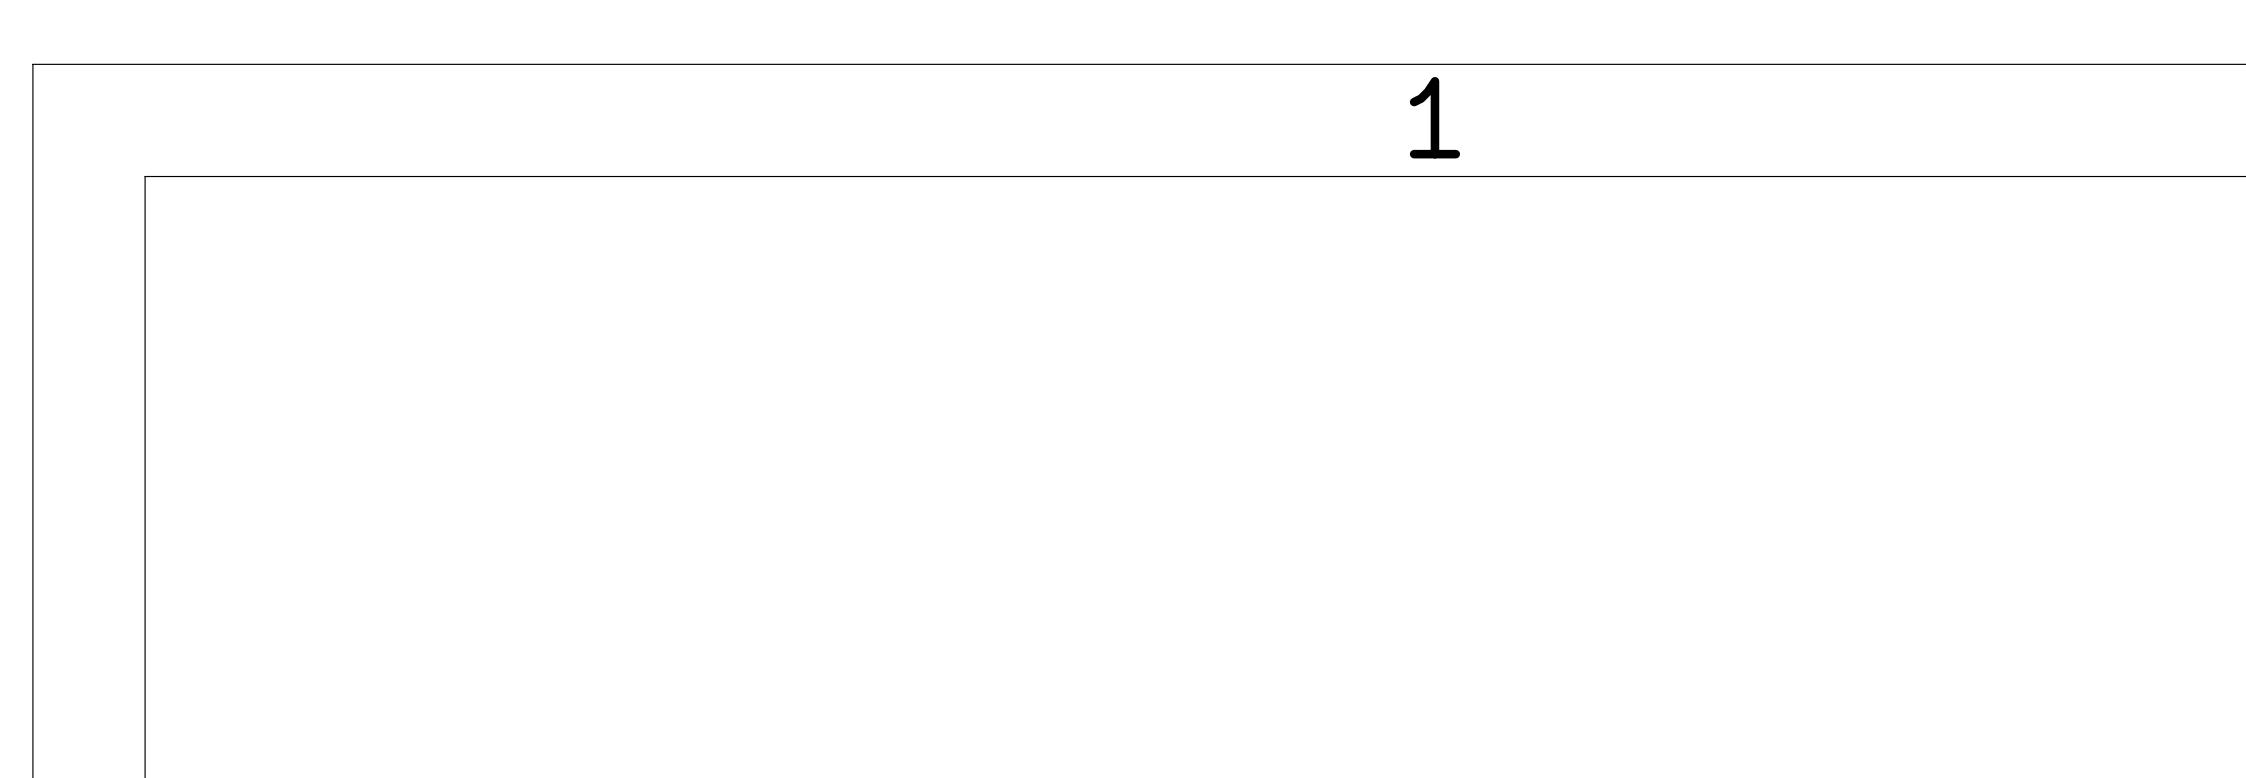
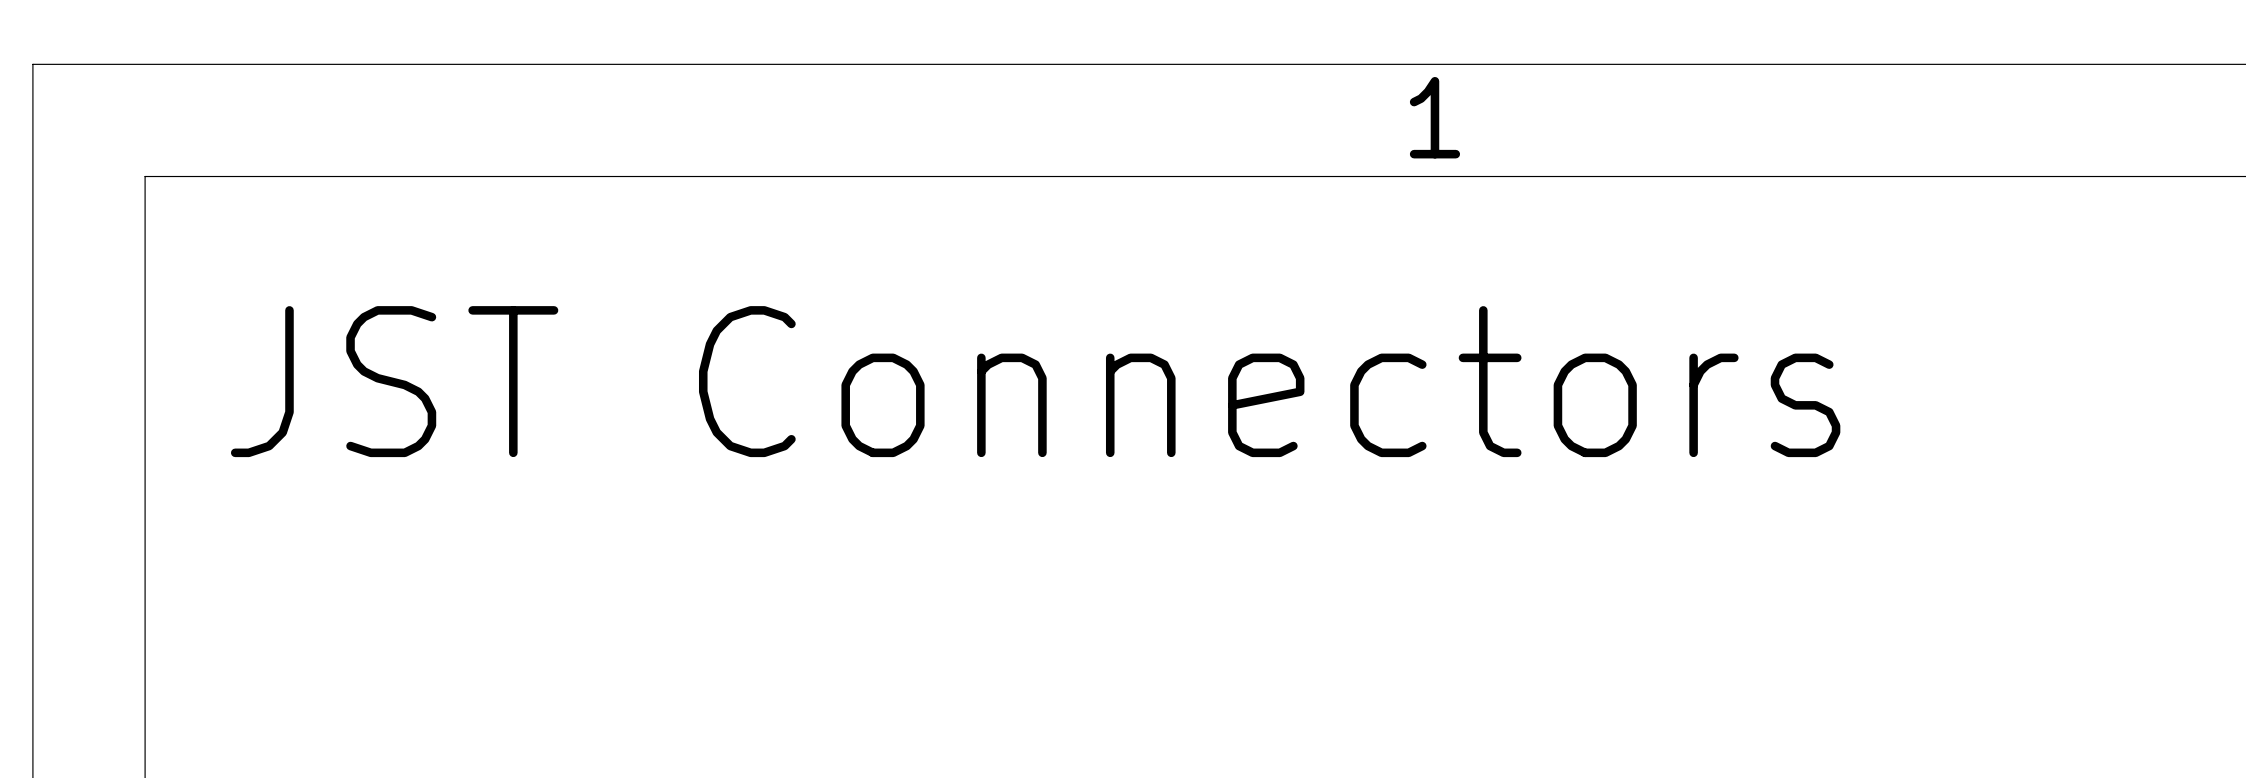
text: none -> JST Connectors (1035, 381)

